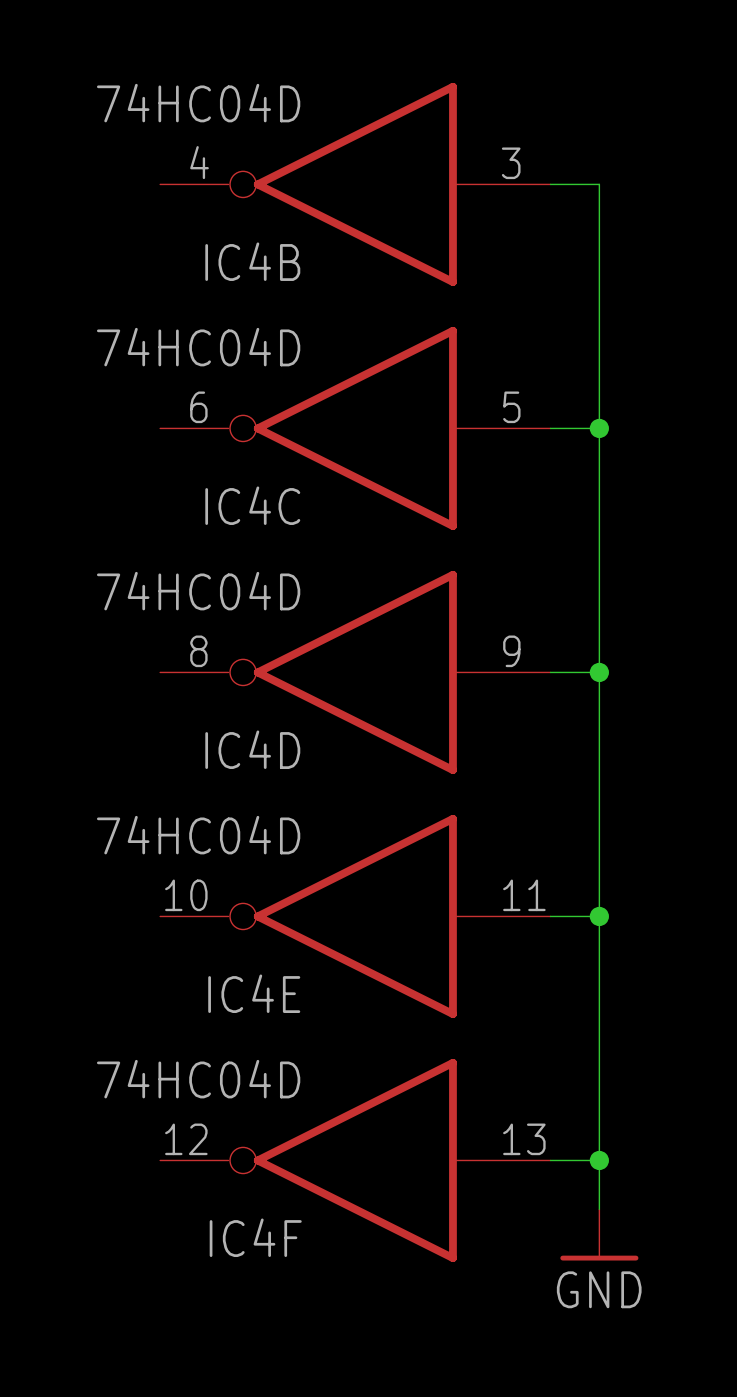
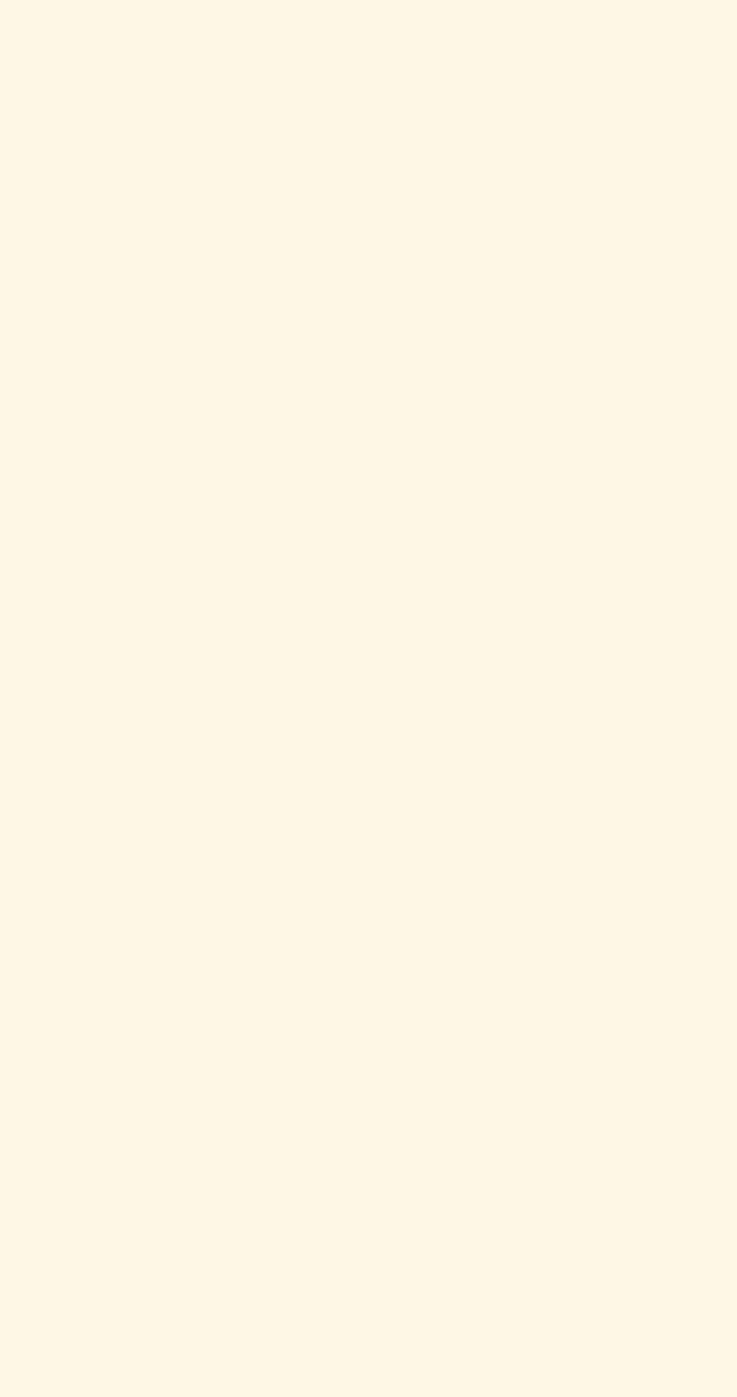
IC4B: 74HC04D (355, 184) -> none
wire: (550, 184) (599, 184) (599, 1209) -> none
IC4C: 74HC04D (355, 428) -> none
wire: (550, 428) (599, 428) -> none
junction: (599, 428) -> none
IC4D: 74HC04D (355, 672) -> none
wire: (550, 672) (599, 672) -> none
junction: (599, 672) -> none
IC4E: 74HC04D (355, 916) -> none
wire: (550, 916) (599, 916) -> none
junction: (599, 916) -> none
IC4F: 74HC04D (355, 1160) -> none
wire: (550, 1160) (599, 1160) -> none
junction: (599, 1160) -> none
power symbol: GND (599, 1234) -> none

